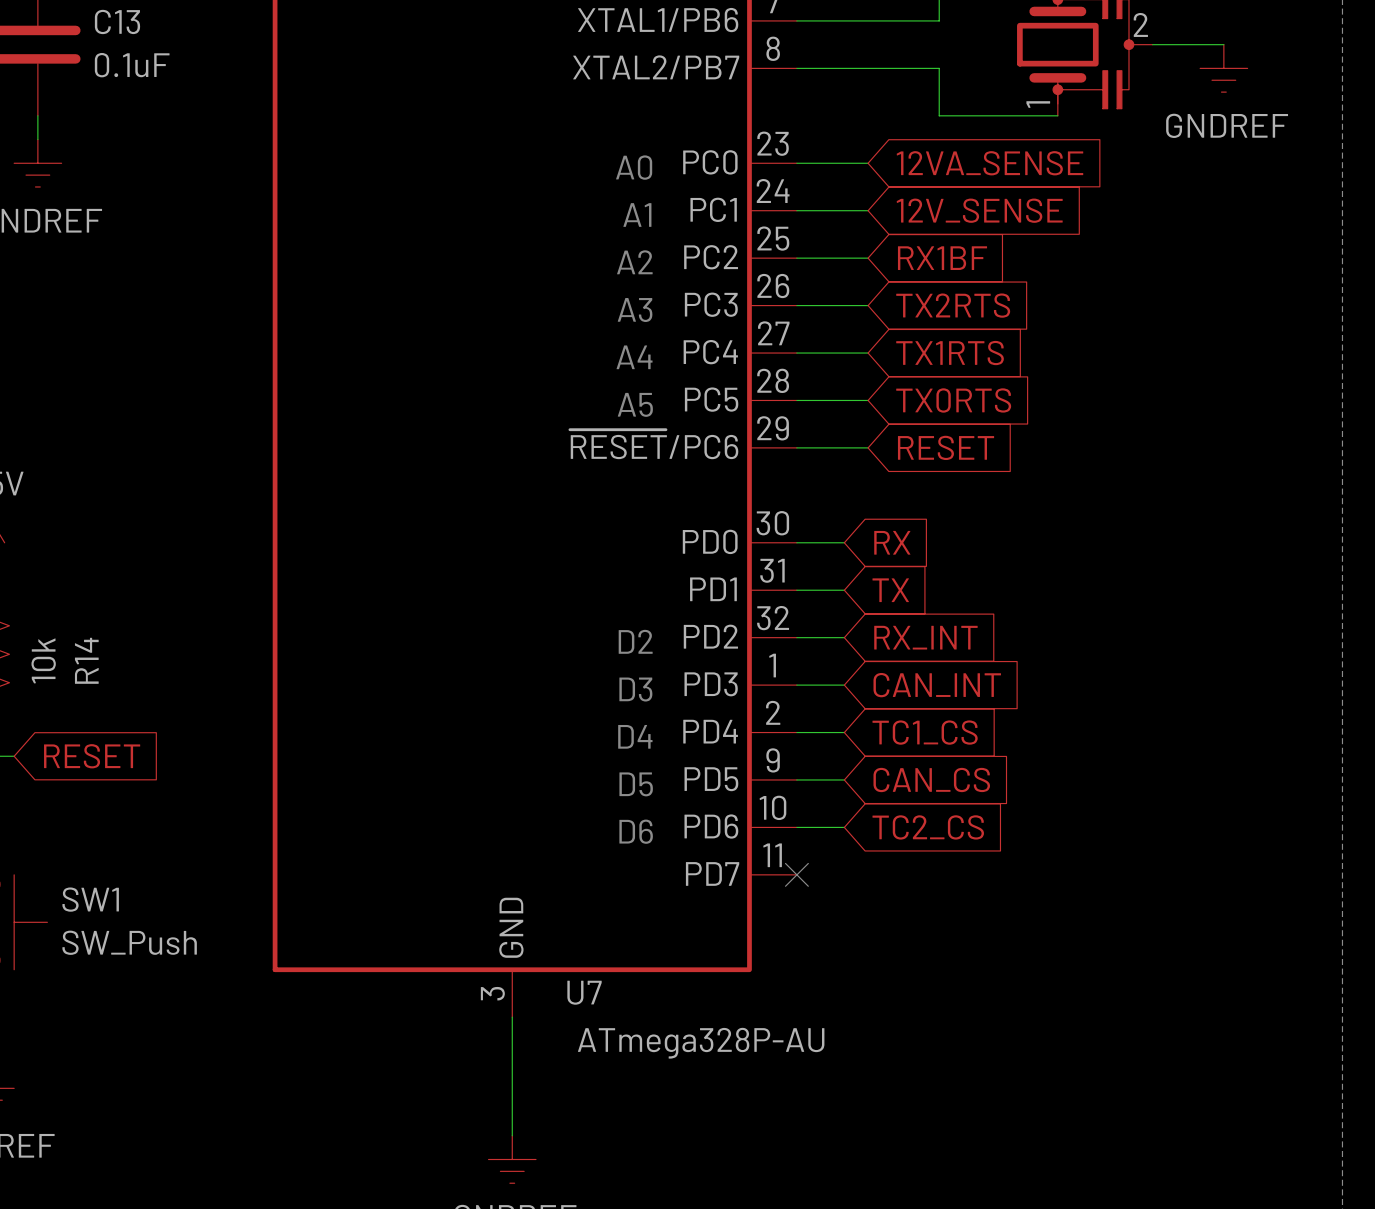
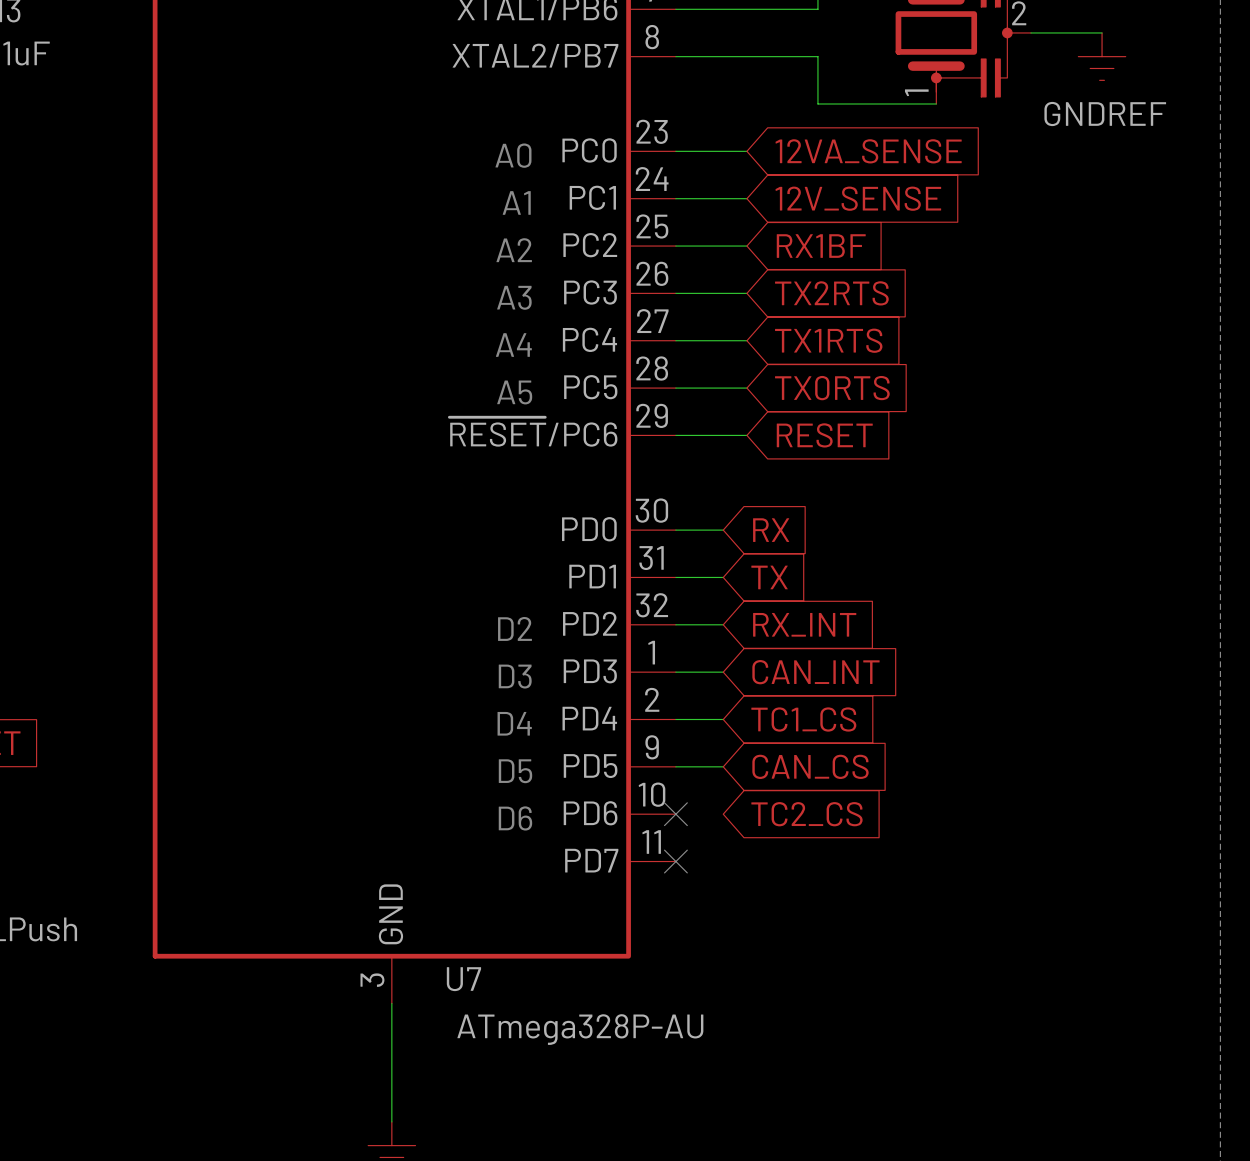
wire: (796, 827) (844, 827) -> none
no-connect mark: none -> (675, 814)

